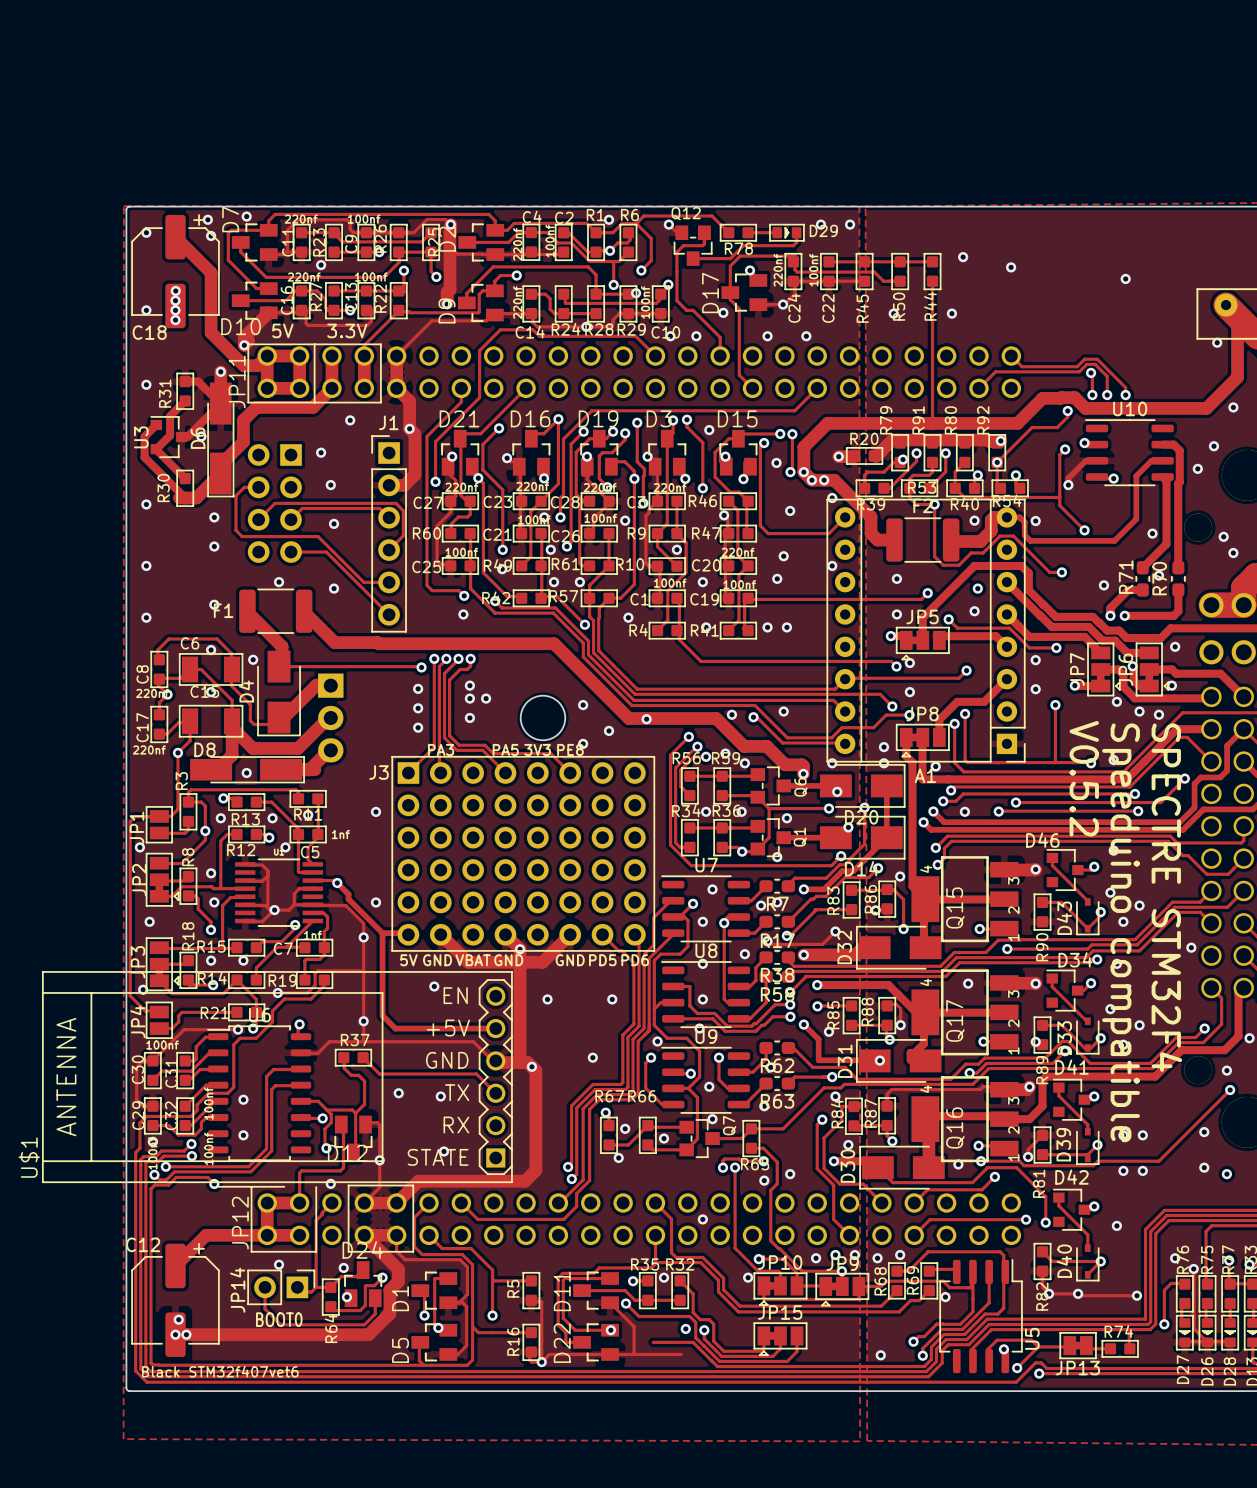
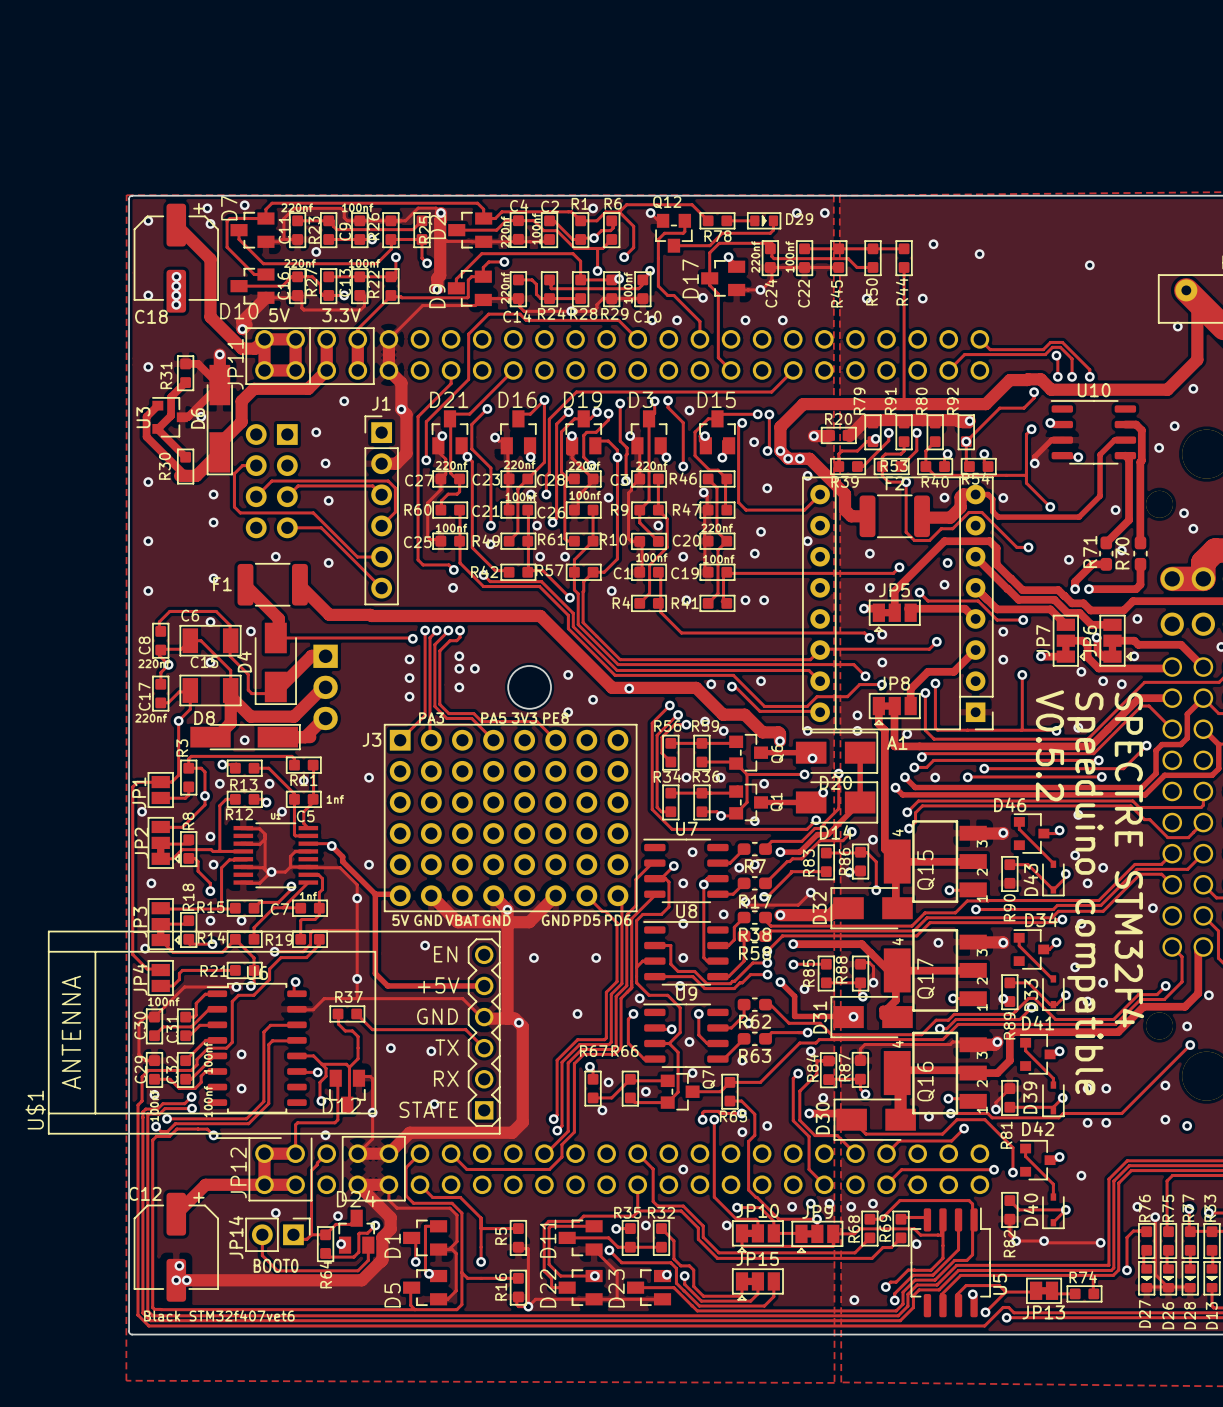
D23: none -> (649, 1287)

